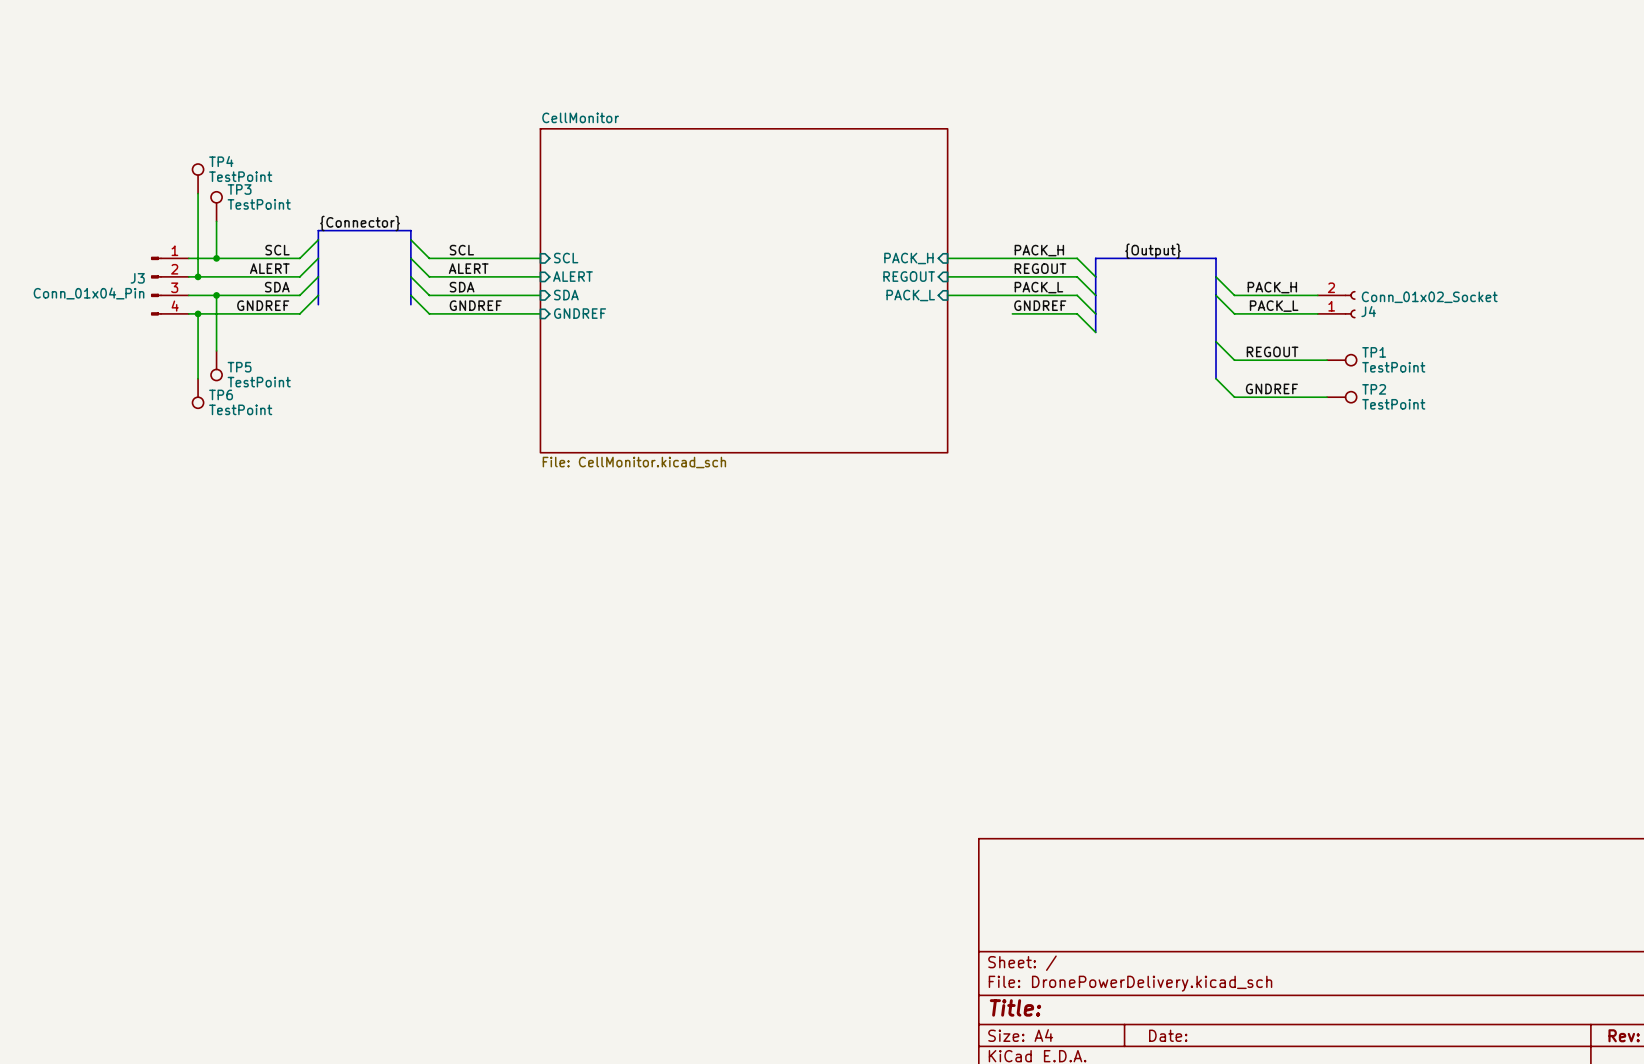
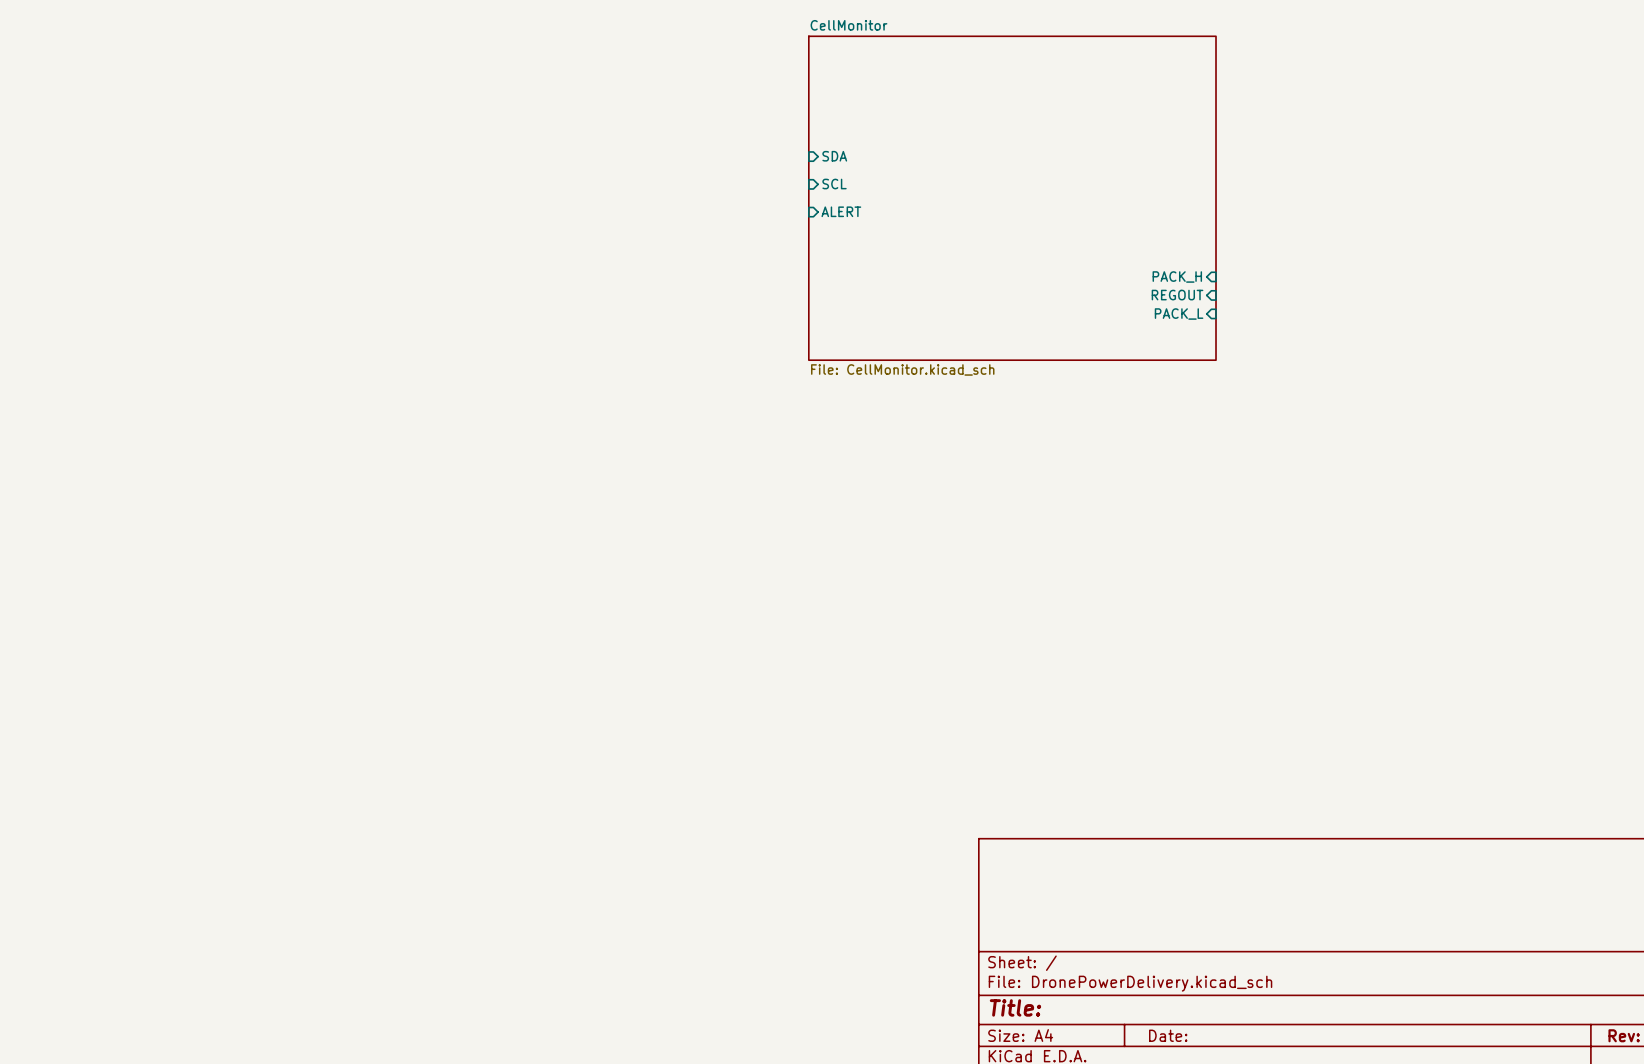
sheet pin: none -> SDA (834, 156)
TP4: TestPoint (198, 178) -> none
sheet pin: none -> SCL (834, 184)
wire: (198, 193) (198, 276) -> none
sheet CellMonitor: none -> File: CellMonitor.kicad_sch (1012, 198)
TP3: TestPoint (216, 206) -> none
sheet pin: none -> ALERT (841, 211)
wire: (216, 221) (216, 258) -> none
label: {Connector} (360, 223) -> none
wire: (318, 239) (299, 258) (188, 258) -> none
wire: (410, 239) (429, 258) (540, 258) -> none
label: SCL (277, 250) -> none
label: SCL (461, 250) -> none
label: PACK_H (1039, 250) -> none
label: {Output} (1153, 251) -> none
junction: (216, 258) -> none
wire: (318, 258) (299, 276) (188, 276) -> none
wire: (410, 258) (429, 276) (540, 276) -> none
sheet pin: SCL (566, 258) -> none
sheet pin: PACK_H (908, 258) -> none
wire: (947, 258) (1077, 258) (1095, 276) -> none
label: ALERT (269, 268) -> none
label: ALERT (468, 268) -> none
label: REGOUT (1040, 268) -> none
junction: (198, 276) -> none
wire: (318, 276) (299, 295) (188, 295) -> none
wire: (410, 276) (429, 295) (540, 295) -> none
sheet pin: ALERT (572, 276) -> none
sheet pin: REGOUT (909, 276) -> none
wire: (947, 276) (1077, 276) (1095, 295) -> none
sheet pin: none -> PACK_H (1177, 276)
wire: (1216, 276) (1234, 295) (1317, 295) -> none
J3: Conn_01x04_Pin (170, 286) -> none
label: SDA (277, 287) -> none
label: SDA (462, 287) -> none
label: PACK_L (1038, 287) -> none
label: PACK_H (1272, 287) -> none
sheet CellMonitor: File: CellMonitor.kicad_sch (744, 290) -> none
wire: (216, 295) (216, 350) -> none
junction: (216, 295) -> none
wire: (318, 295) (299, 313) (188, 313) -> none
wire: (410, 295) (429, 313) (540, 313) -> none
sheet pin: SDA (566, 295) -> none
sheet pin: PACK_L (910, 295) -> none
wire: (947, 295) (1077, 295) (1095, 313) -> none
sheet pin: none -> REGOUT (1177, 295)
wire: (1216, 295) (1234, 313) (1317, 313) -> none
bus: (318, 304) (318, 230) (410, 230) (410, 304) -> none
J4: Conn_01x02_Socket (1336, 304) -> none
label: GNDREF (263, 305) -> none
label: GNDREF (475, 305) -> none
label: GNDREF (1040, 305) -> none
label: PACK_L (1274, 306) -> none
wire: (198, 313) (198, 378) -> none
junction: (198, 313) -> none
sheet pin: GNDREF (580, 313) -> none
wire: (1012, 313) (1077, 313) (1095, 332) -> none
sheet pin: none -> PACK_L (1179, 314)
bus: (1095, 332) (1095, 258) (1216, 258) (1216, 378) -> none
wire: (1216, 341) (1234, 360) (1327, 360) -> none
label: REGOUT (1272, 351) -> none
TP1: TestPoint (1341, 360) -> none
TP5: TestPoint (216, 365) -> none
wire: (1216, 378) (1234, 397) (1327, 397) -> none
label: GNDREF (1271, 388) -> none
TP6: TestPoint (198, 393) -> none
TP2: TestPoint (1341, 397) -> none

